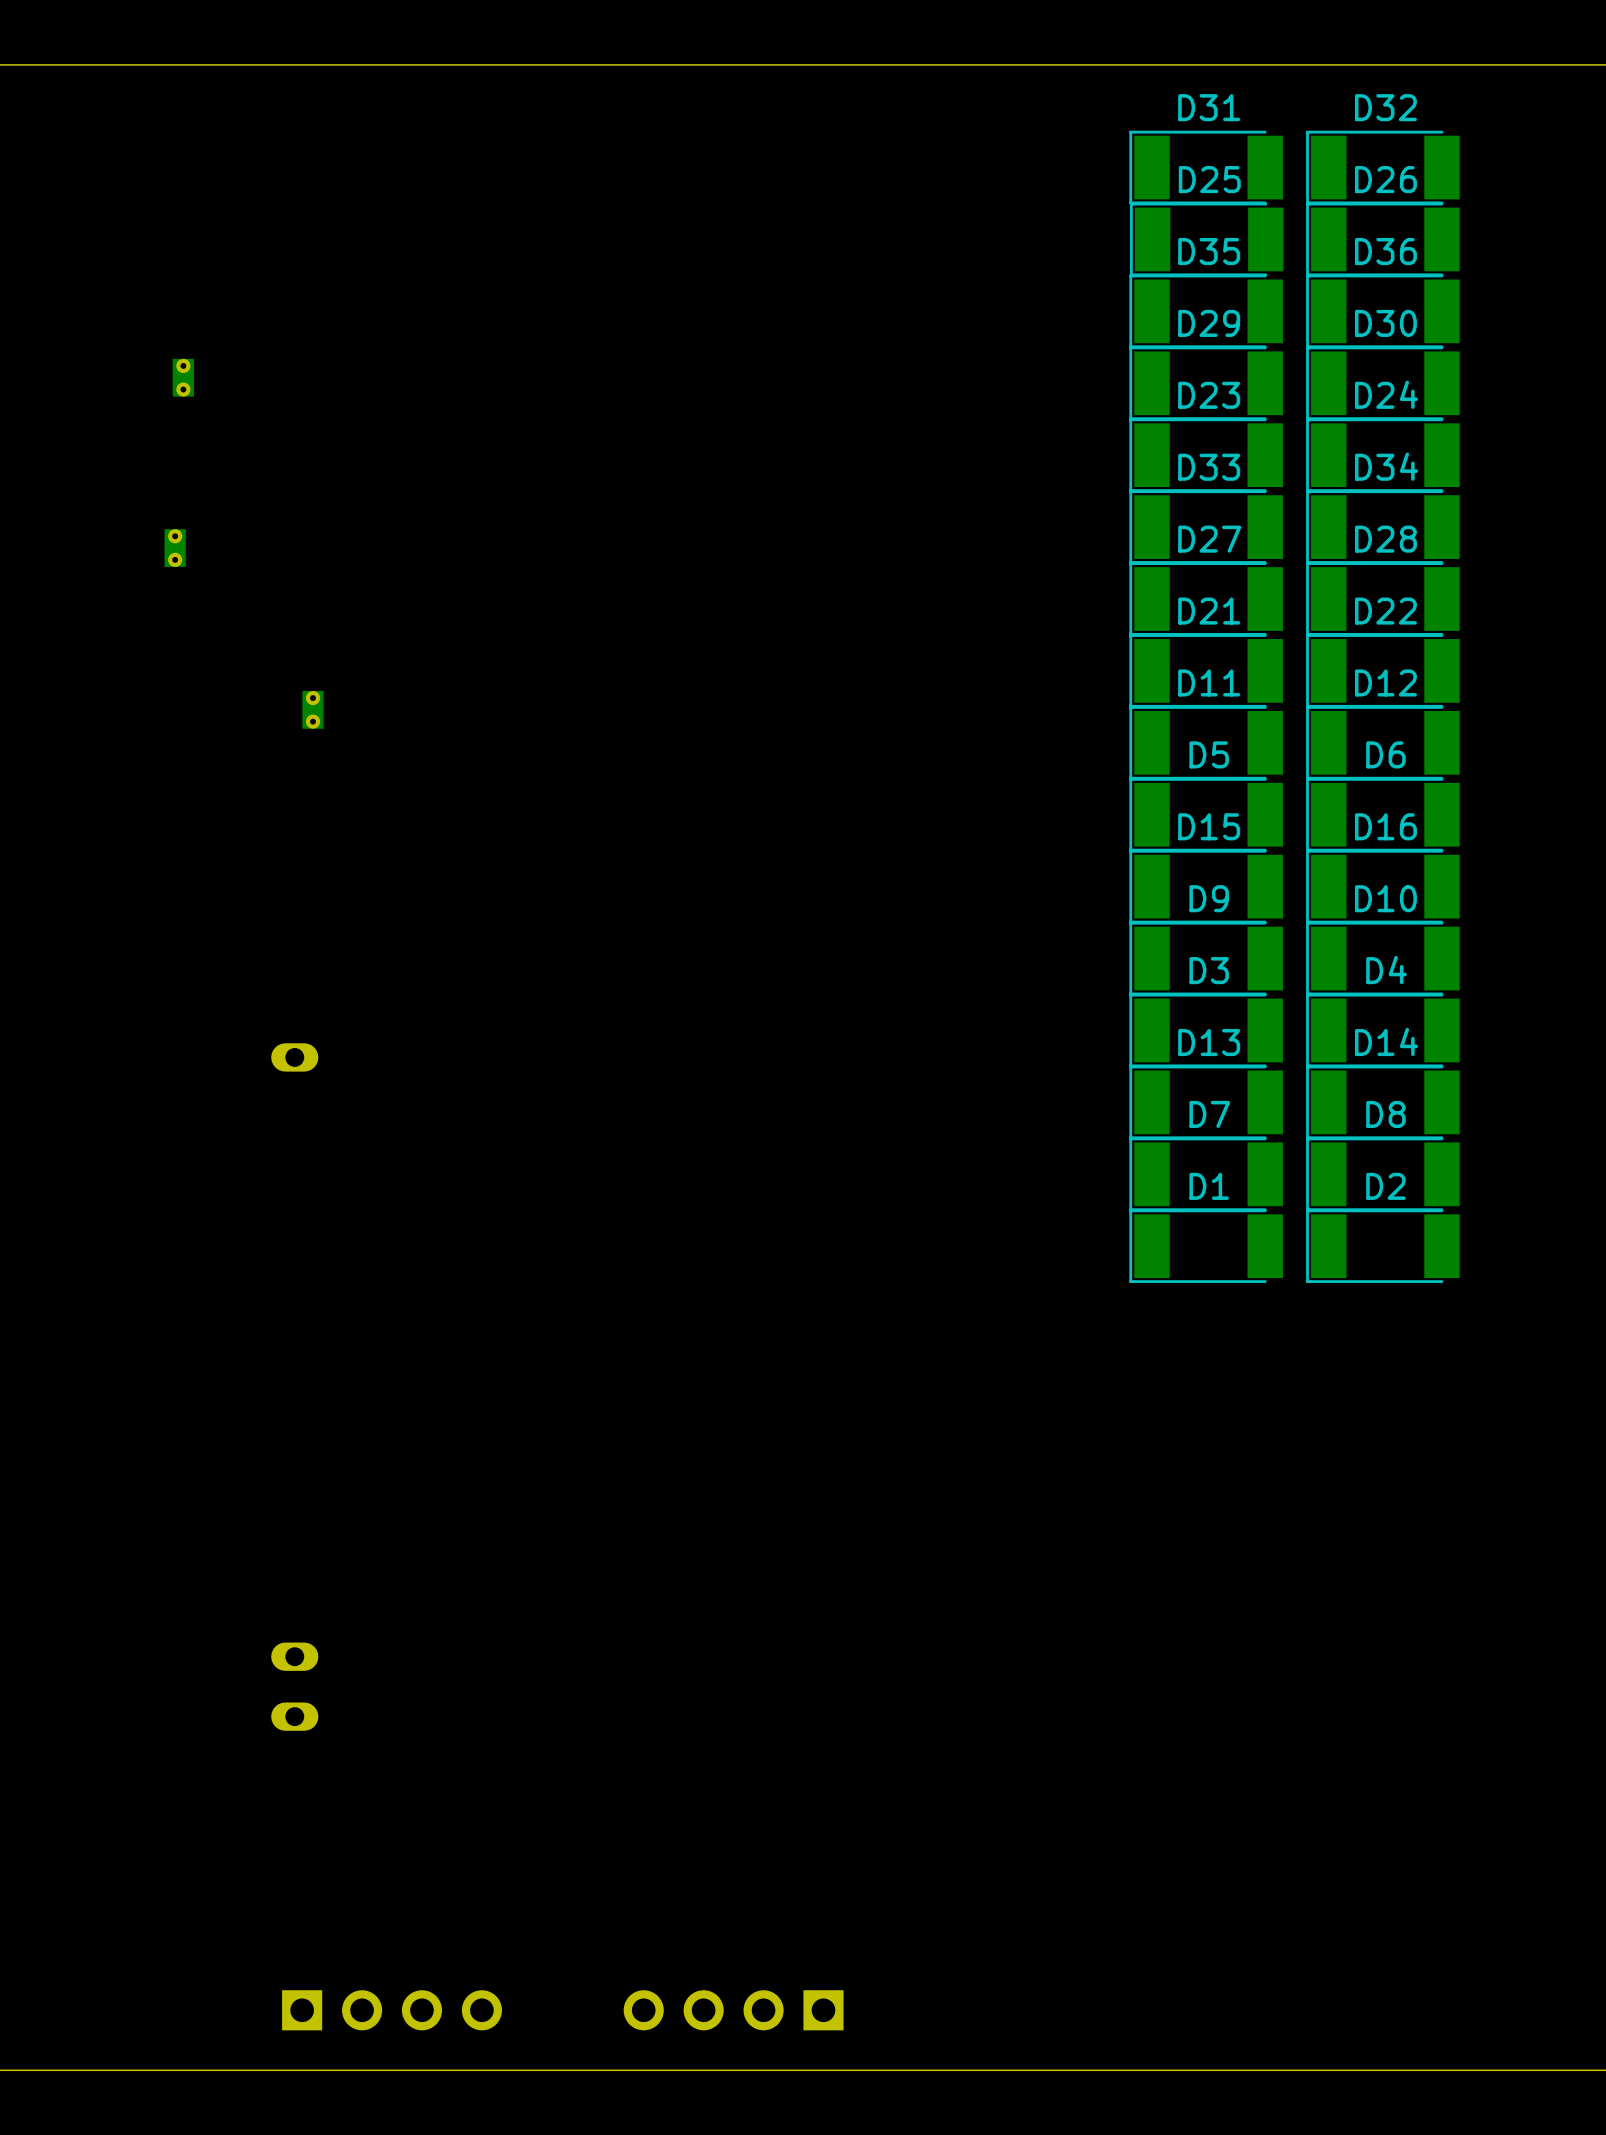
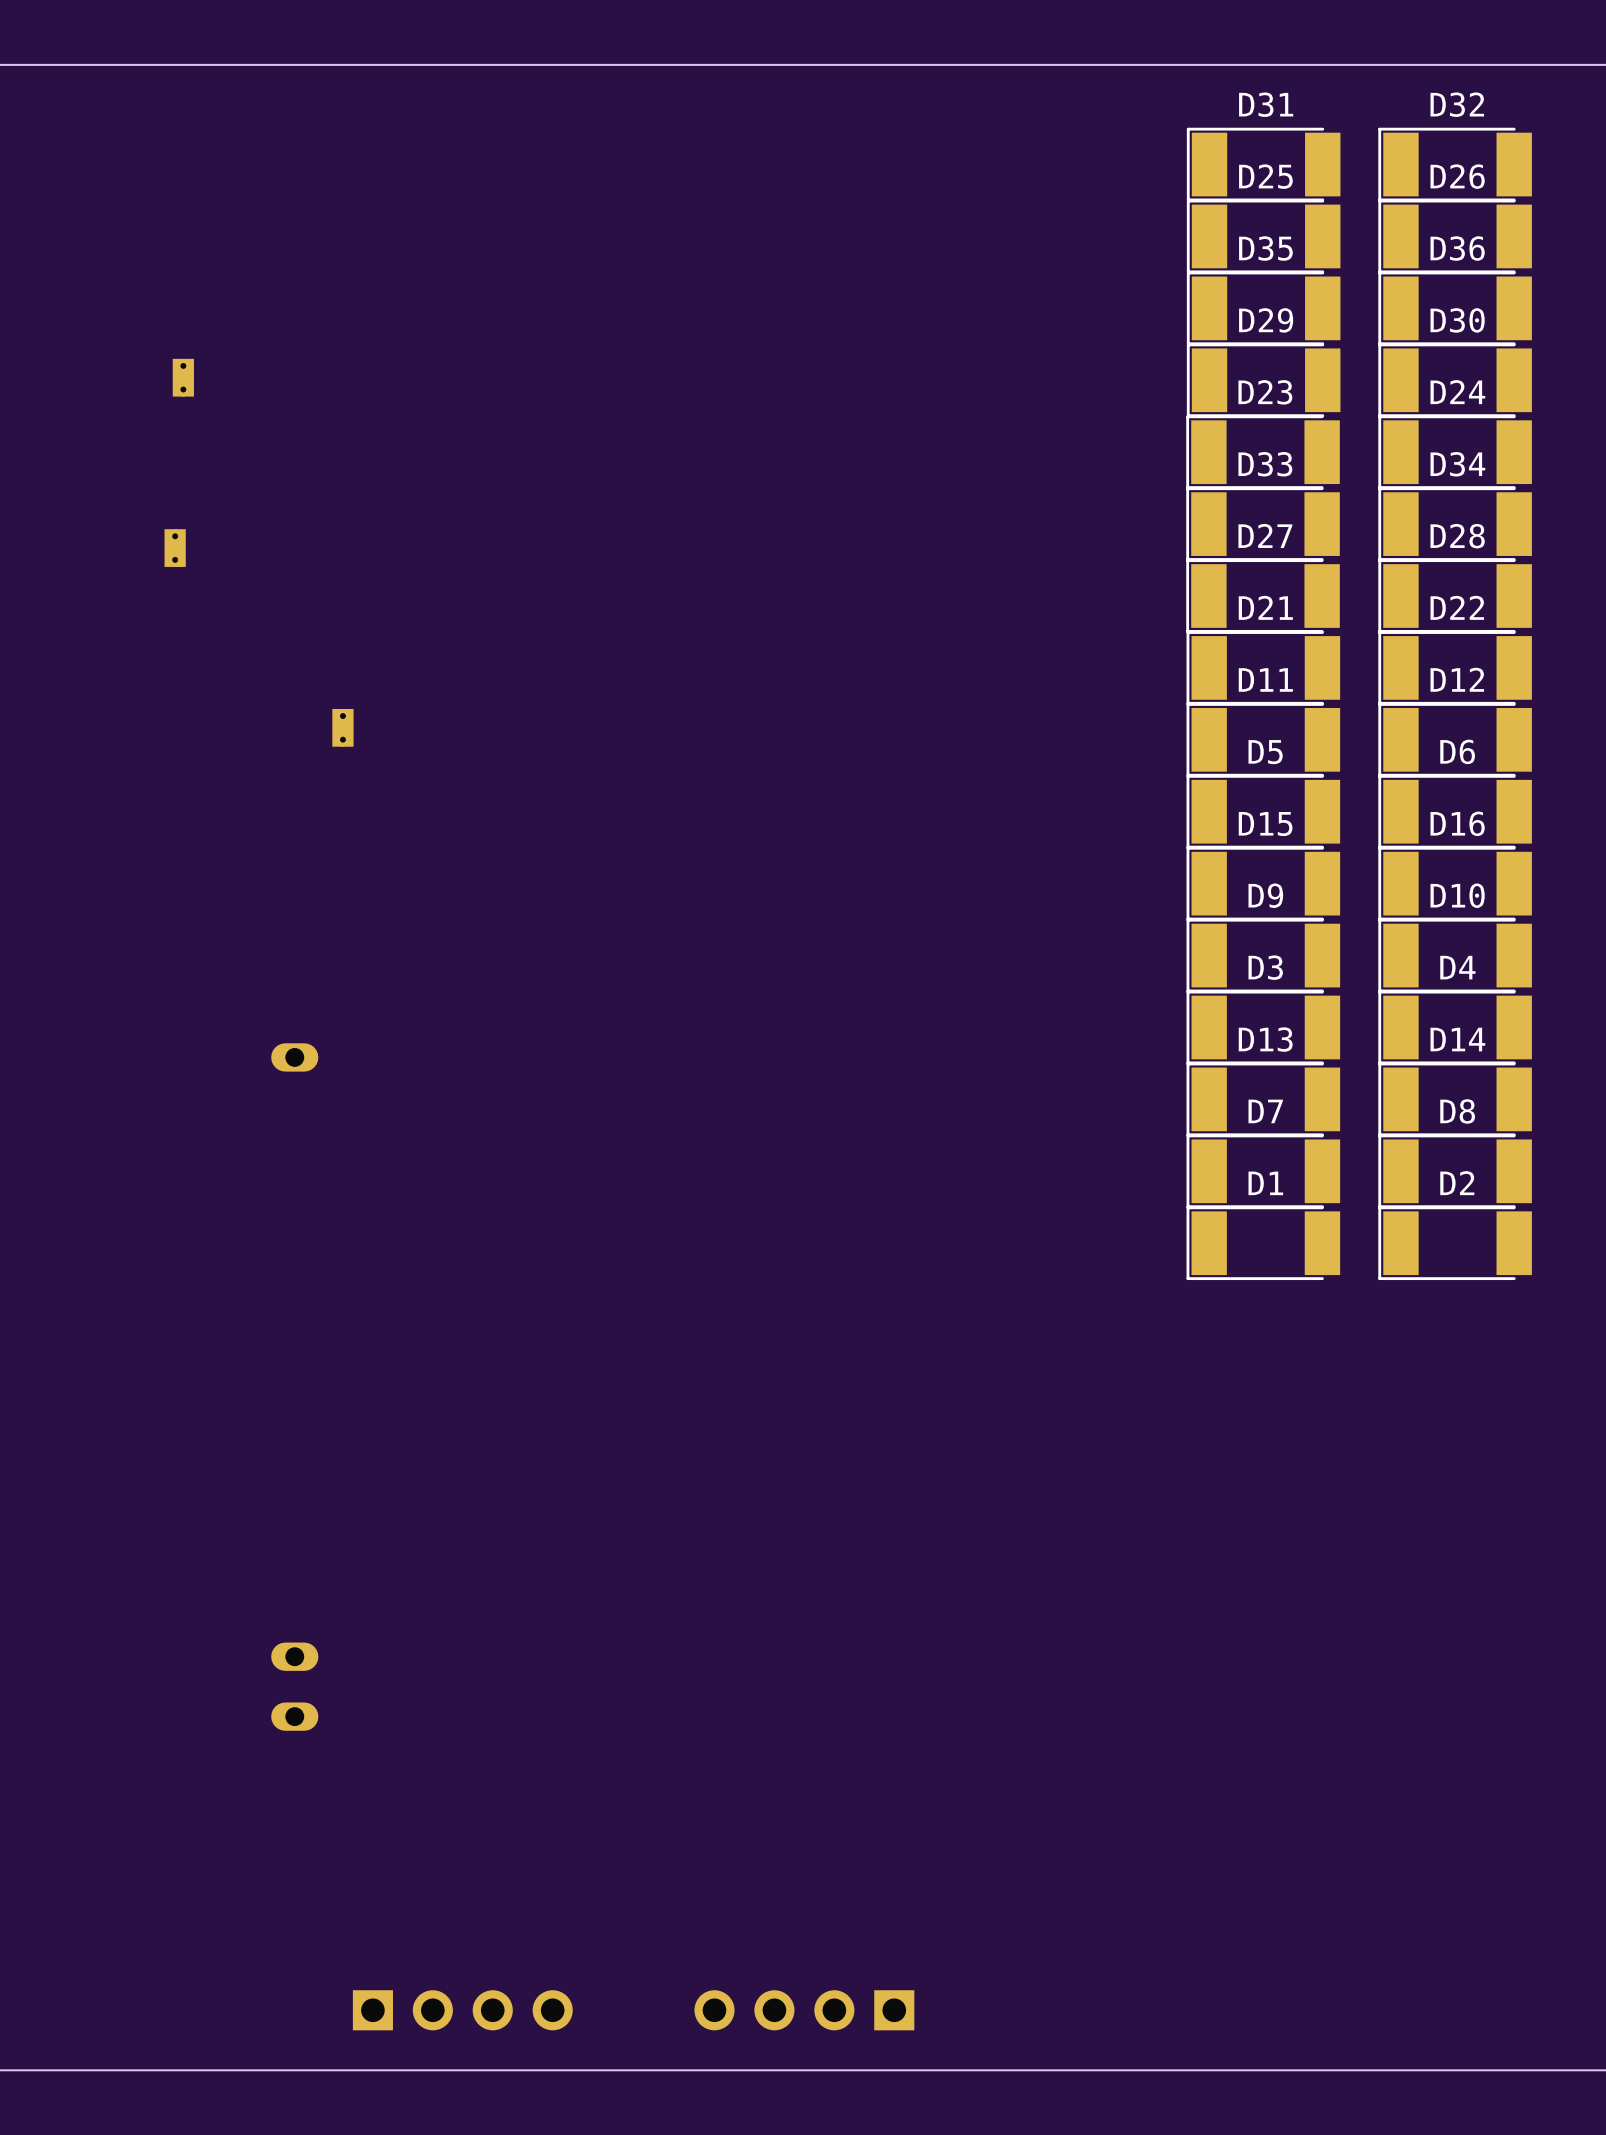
D31 position: (1206, 167) -> (1263, 164)
D32 position: (1382, 167) -> (1455, 164)
D25 position: (1206, 239) -> (1263, 236)
D26 position: (1382, 239) -> (1455, 236)
D35 position: (1206, 311) -> (1263, 308)
D36 position: (1382, 311) -> (1455, 308)
D29 position: (1206, 383) -> (1263, 380)
D30 position: (1382, 383) -> (1455, 380)
D23 position: (1206, 455) -> (1263, 452)
D24 position: (1382, 455) -> (1455, 452)
D33 position: (1206, 527) -> (1263, 524)
D34 position: (1382, 527) -> (1455, 524)
D27 position: (1206, 599) -> (1263, 596)
D28 position: (1382, 599) -> (1455, 596)
D21 position: (1206, 670) -> (1263, 667)
D22 position: (1382, 670) -> (1455, 667)
part position: (312, 709) -> (342, 727)
D11 position: (1206, 742) -> (1263, 739)
D12 position: (1382, 742) -> (1455, 739)
D5 position: (1206, 814) -> (1263, 811)
D6 position: (1382, 814) -> (1455, 811)
D15 position: (1206, 886) -> (1263, 883)
D16 position: (1382, 886) -> (1455, 883)
D9 position: (1206, 958) -> (1263, 955)
D10 position: (1382, 958) -> (1455, 955)
D3 position: (1206, 1030) -> (1263, 1027)
D4 position: (1382, 1030) -> (1455, 1027)
D13 position: (1206, 1102) -> (1263, 1099)
D14 position: (1382, 1102) -> (1455, 1099)
D7 position: (1206, 1174) -> (1263, 1171)
D8 position: (1382, 1174) -> (1455, 1171)
D1 position: (1206, 1246) -> (1263, 1243)
D2 position: (1382, 1246) -> (1455, 1243)
part position: (392, 2010) -> (462, 2010)
part position: (733, 2010) -> (804, 2010)

